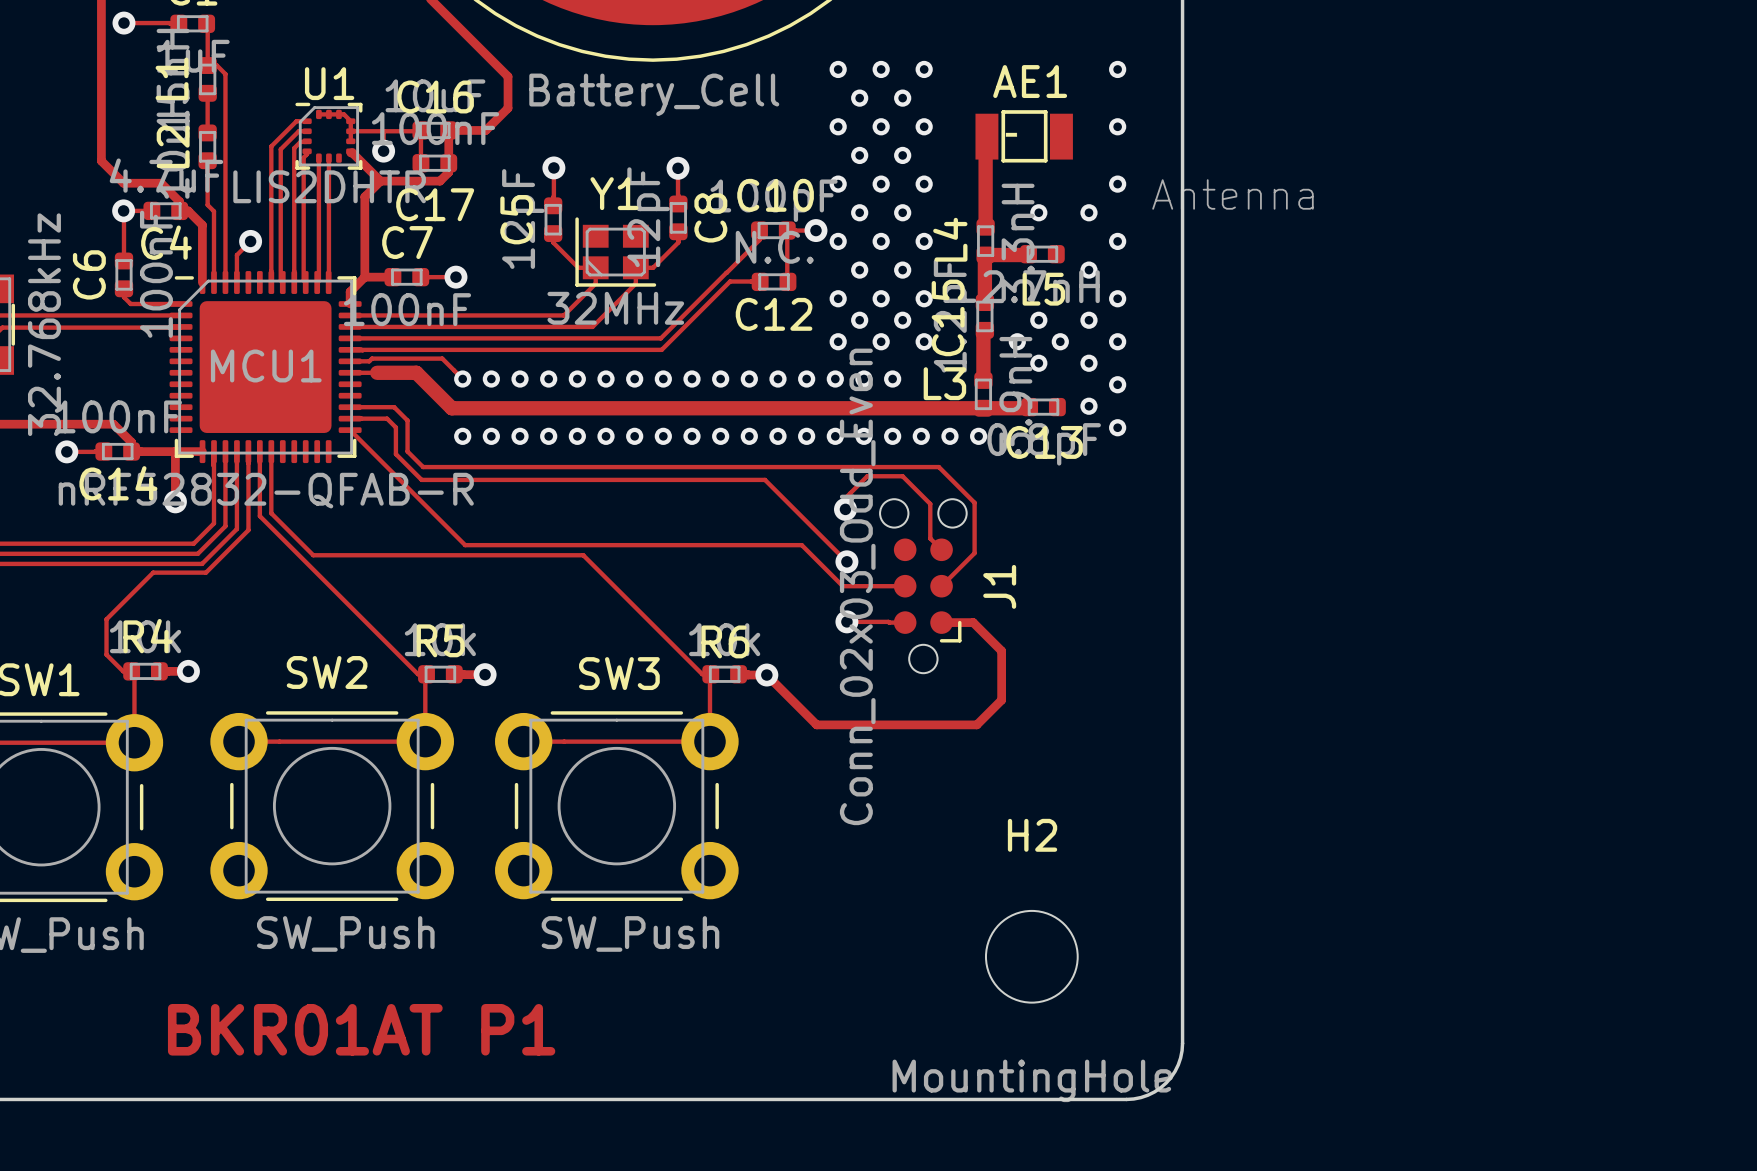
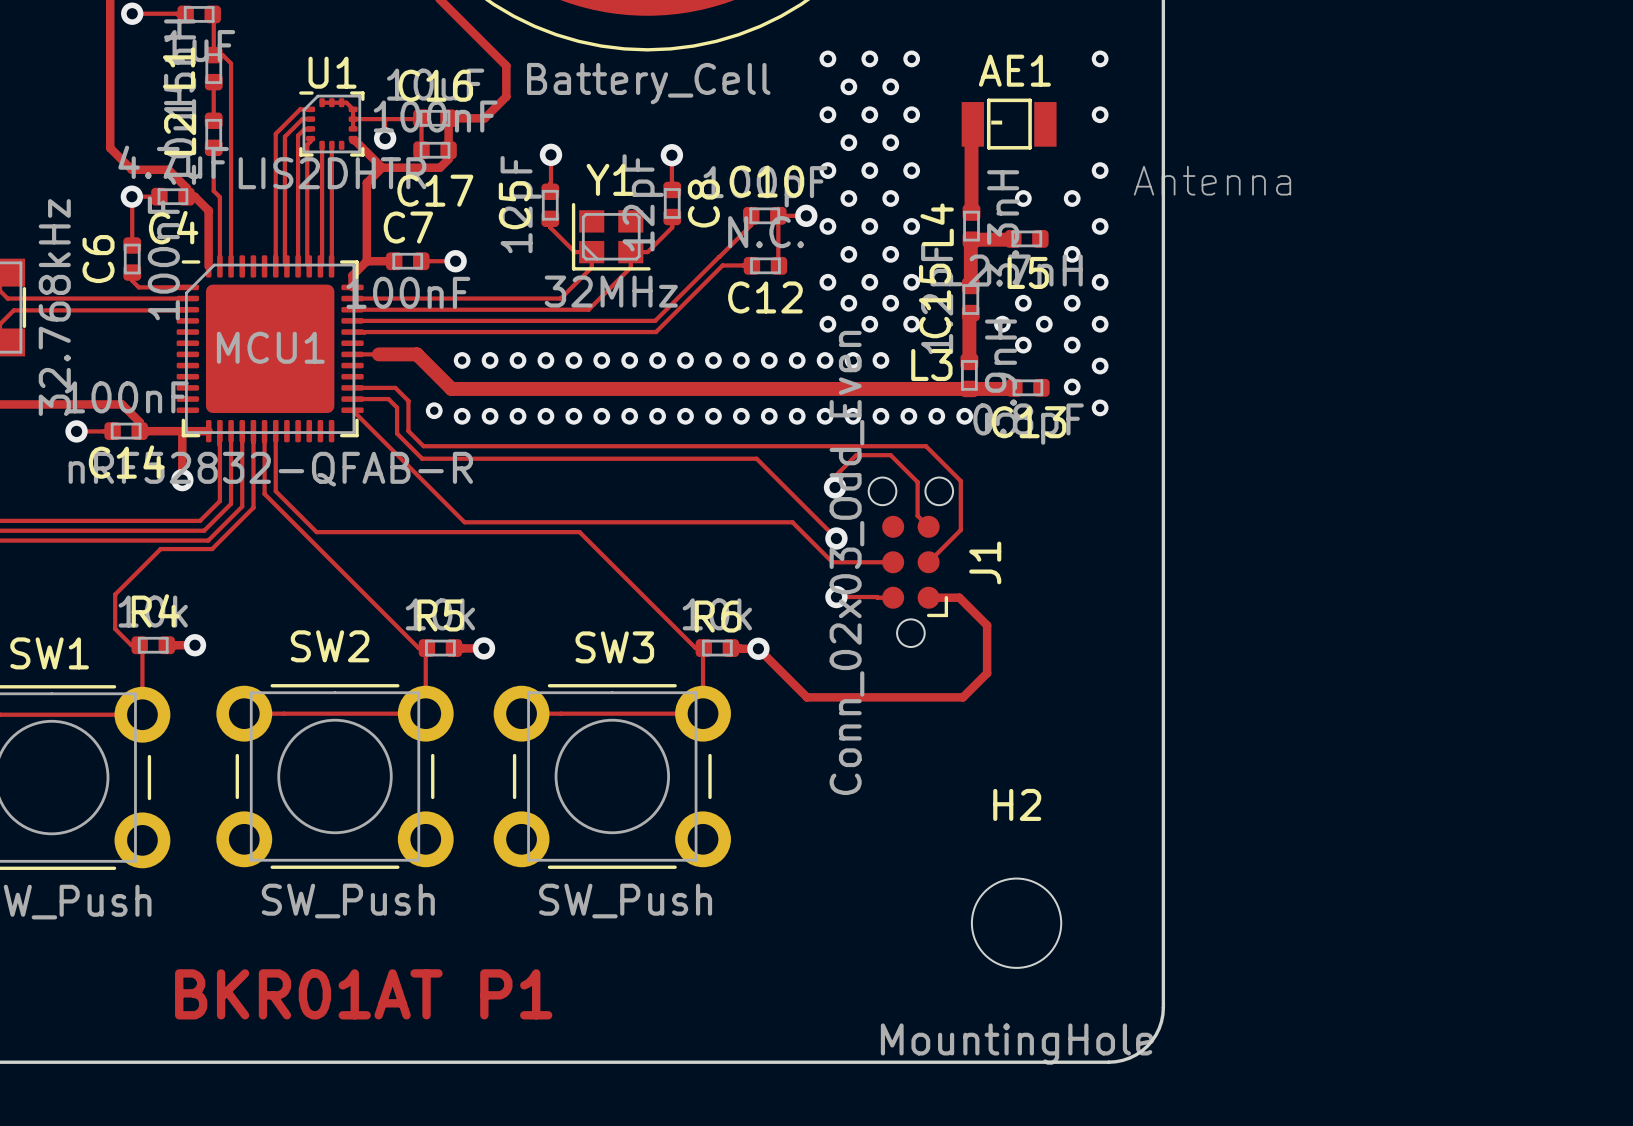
track: (250, 241) (236, 255) (236, 282) -> none
via: (250, 241) -> none
track: (350, 361) (369, 361) (371, 358) (442, 358) (462, 379) -> none
via: none -> (434, 410)

